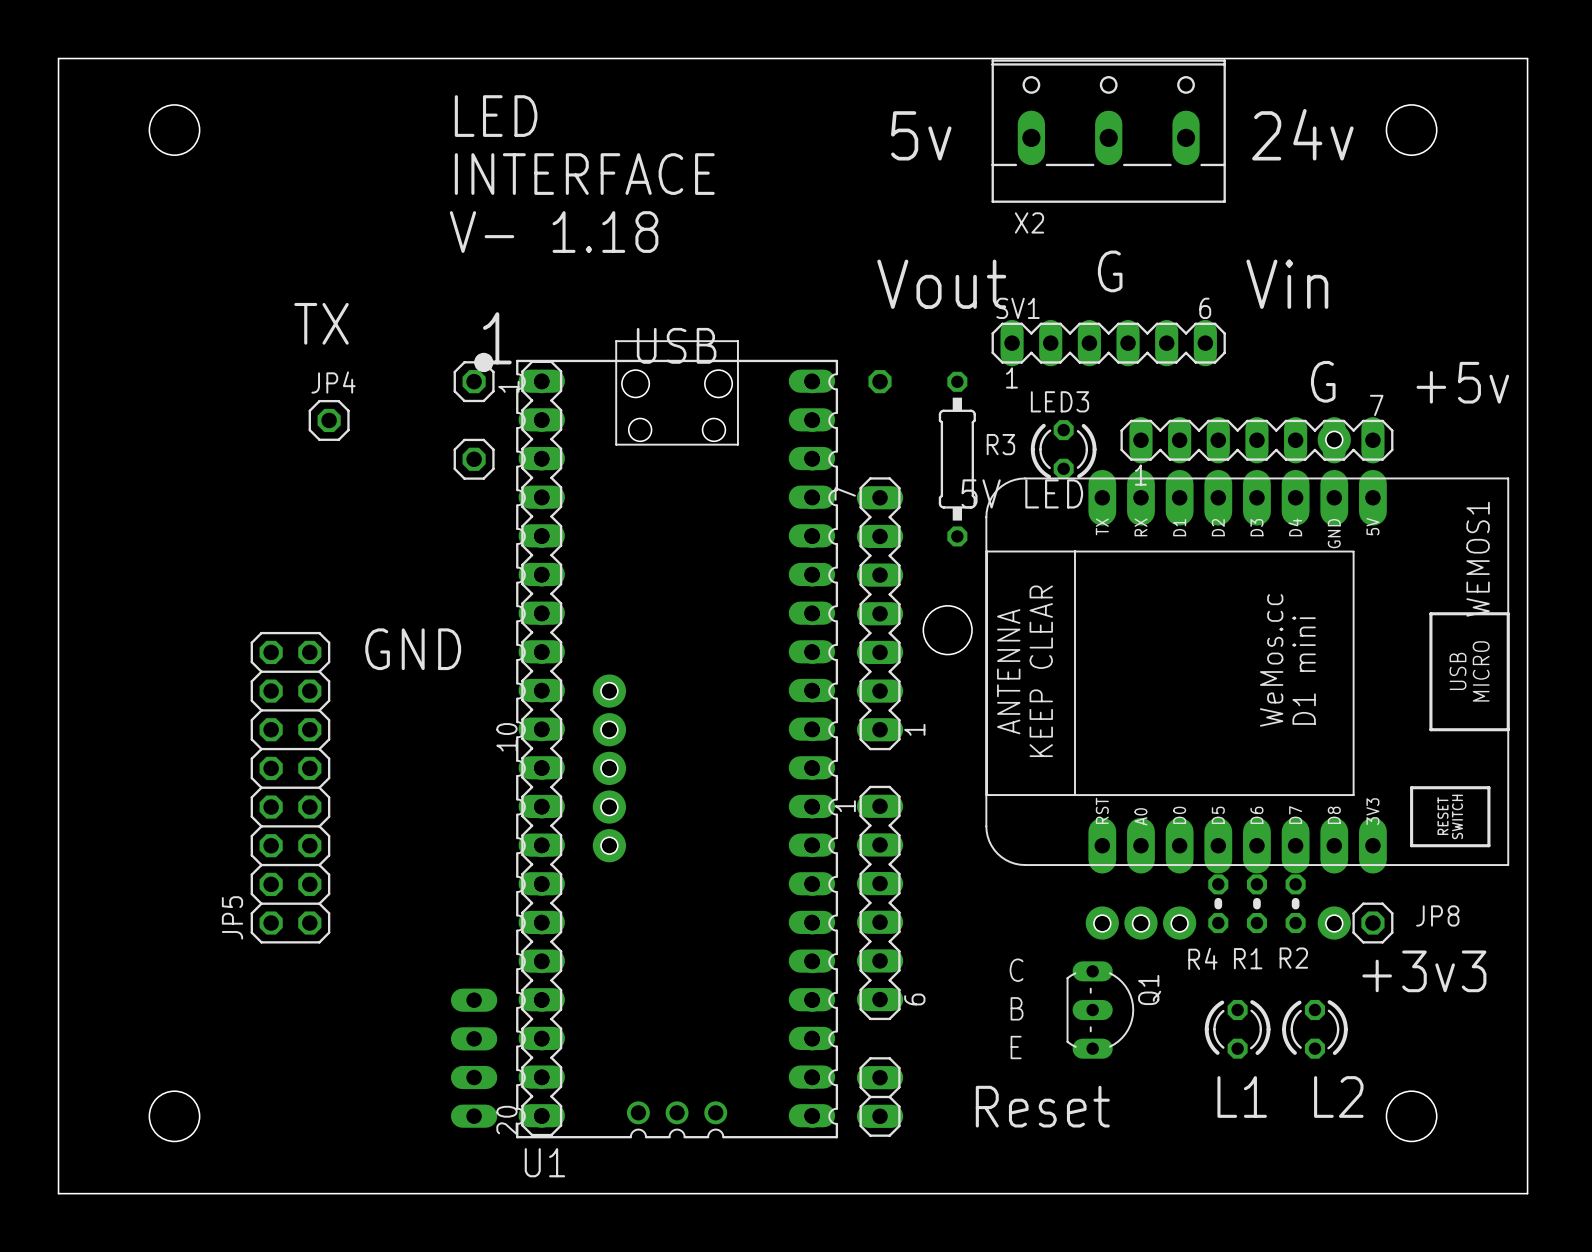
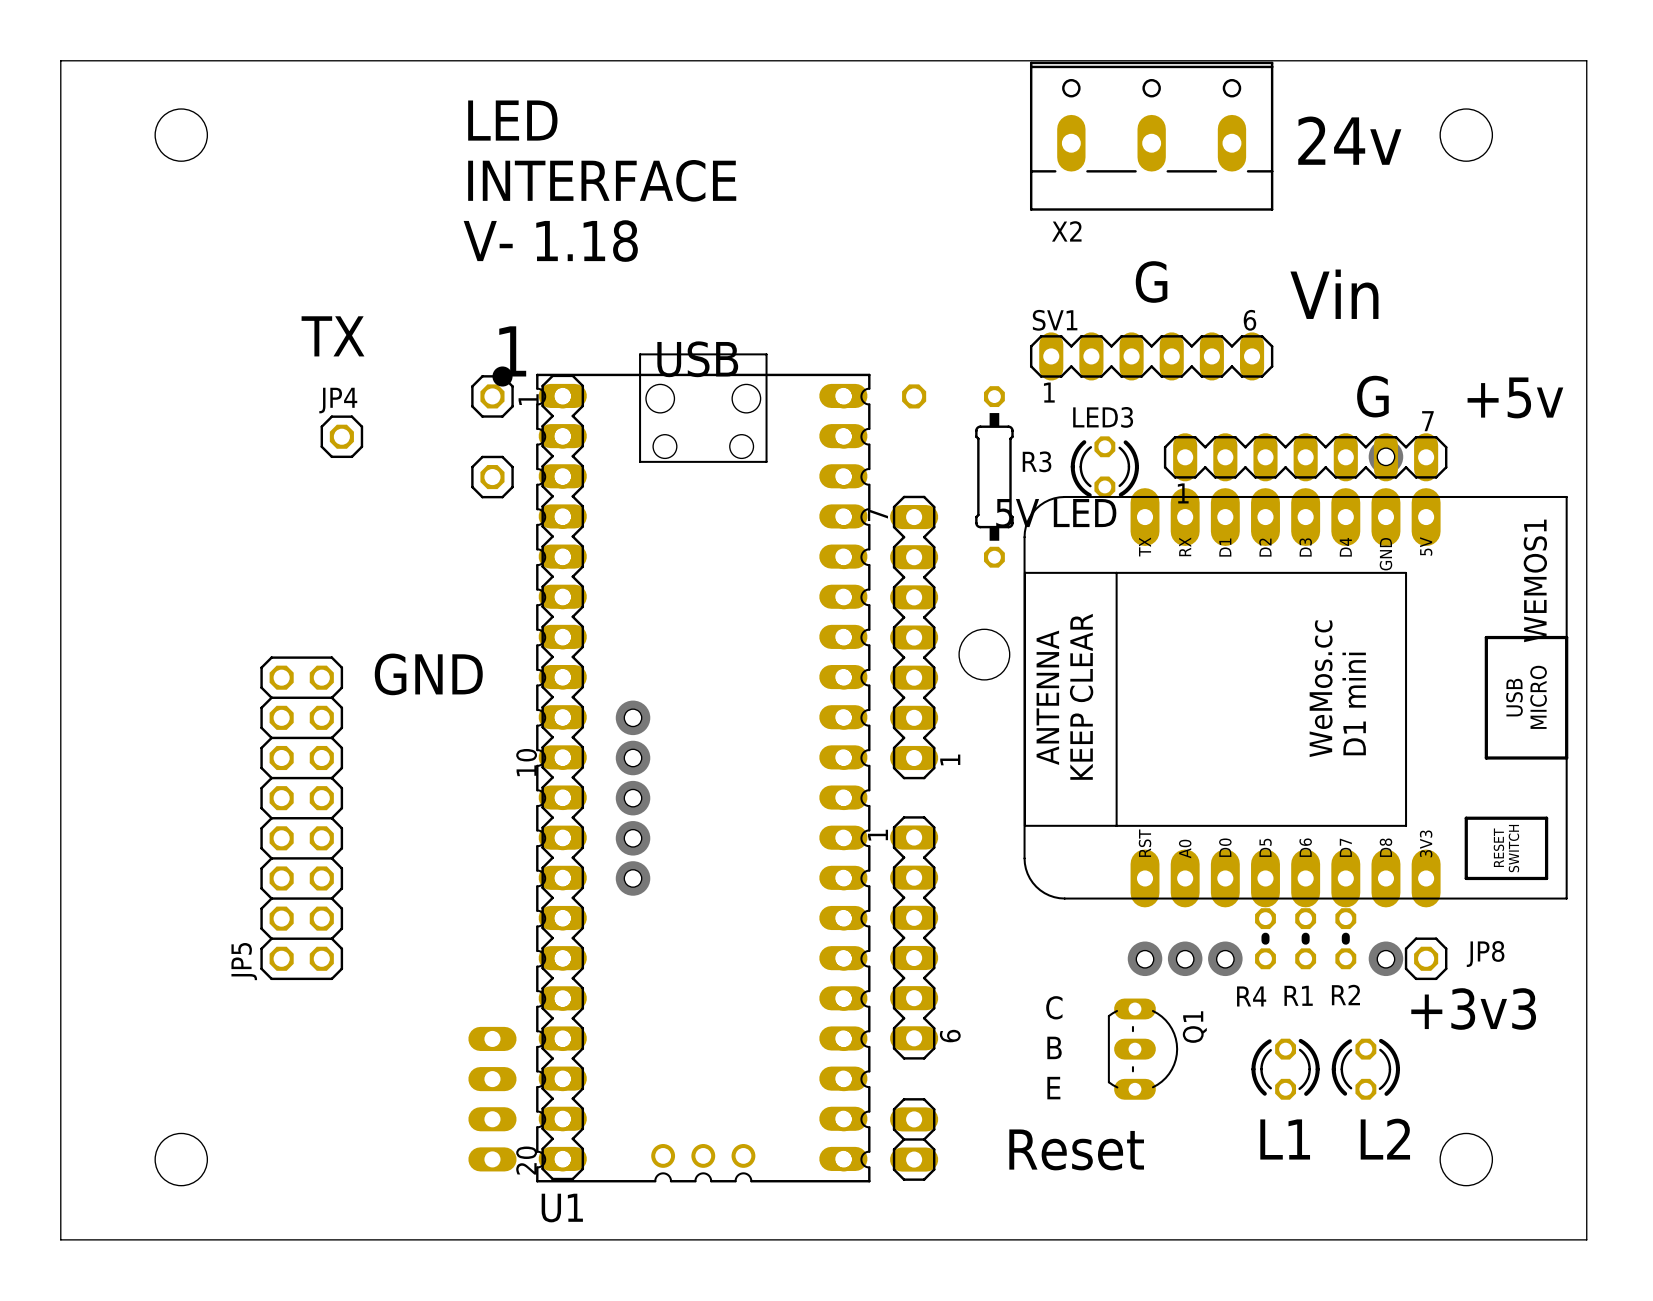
text: 5v (921, 135) -> none
text: Vout (941, 284) -> none

